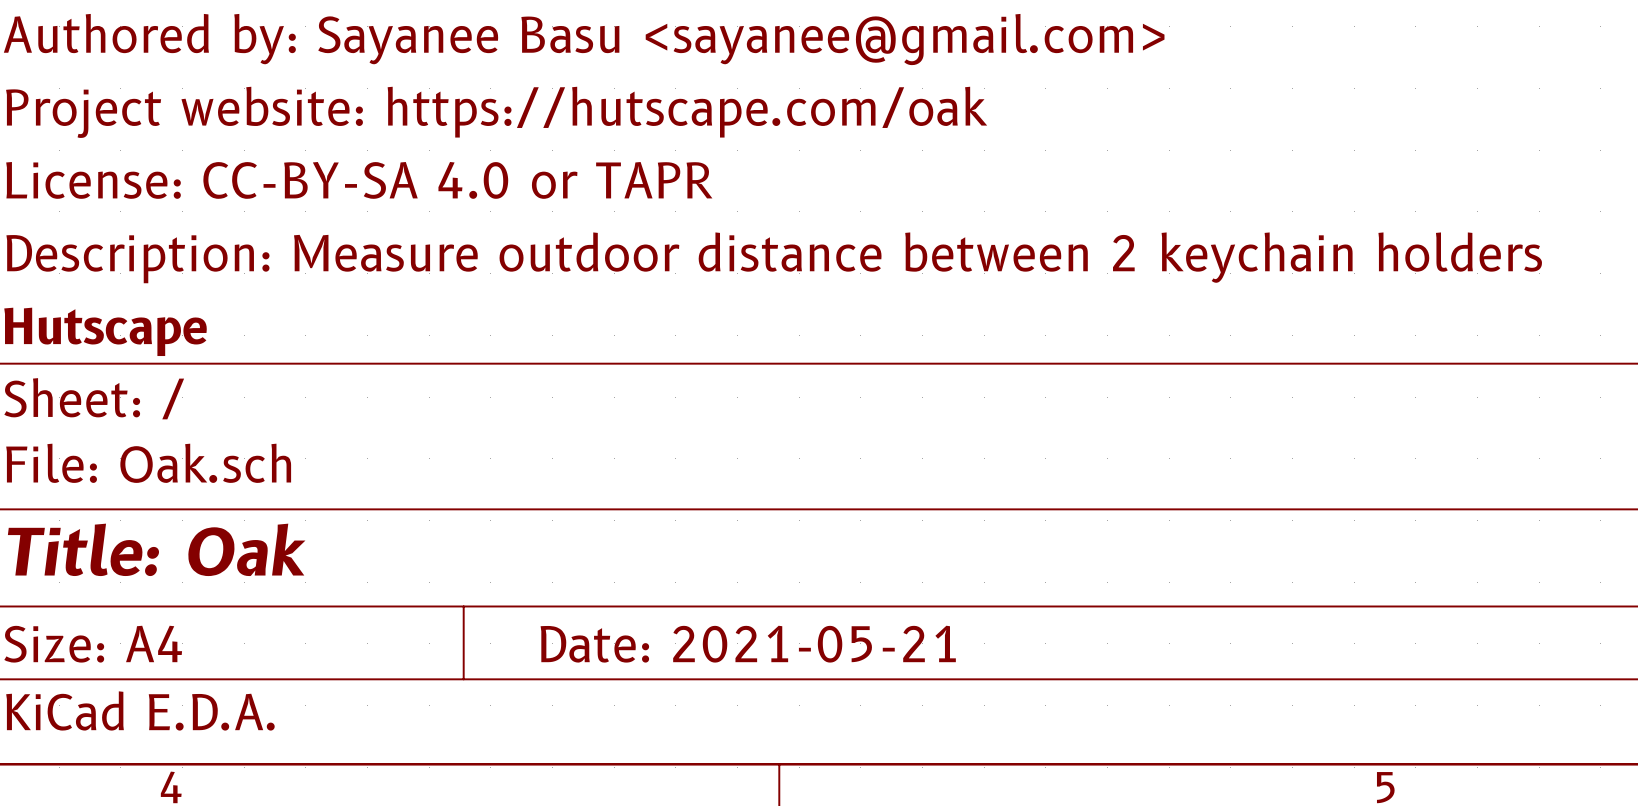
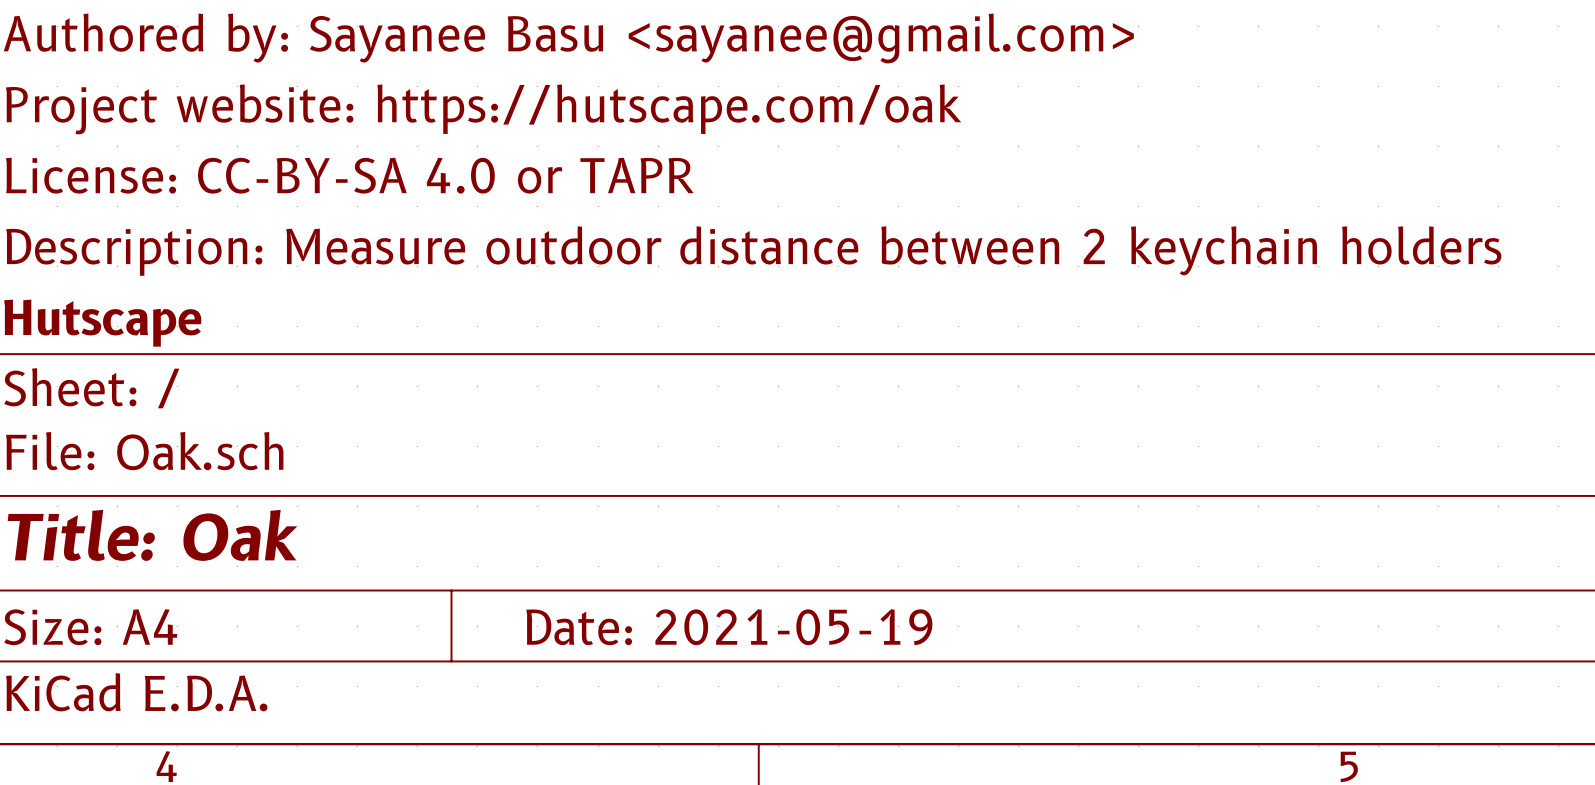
title block: Date: 2021-05-21 (748, 644) -> Date: 2021-05-19 (729, 627)

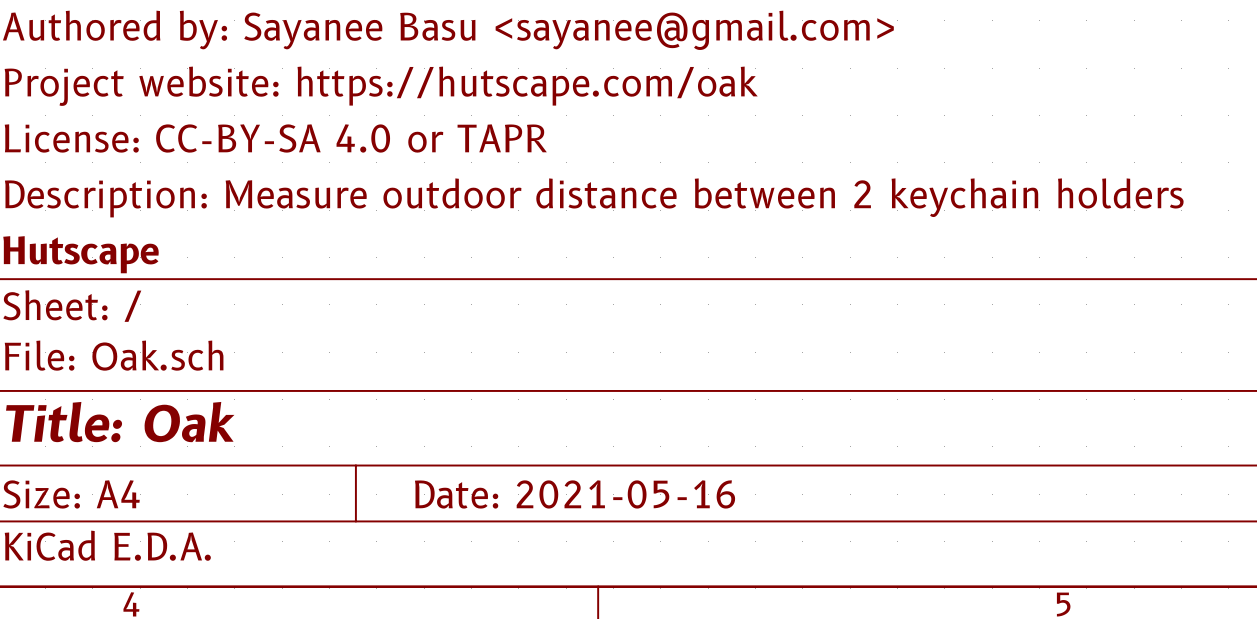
title block: Date: 2021-05-19 (729, 627) -> Date: 2021-05-16 (575, 494)

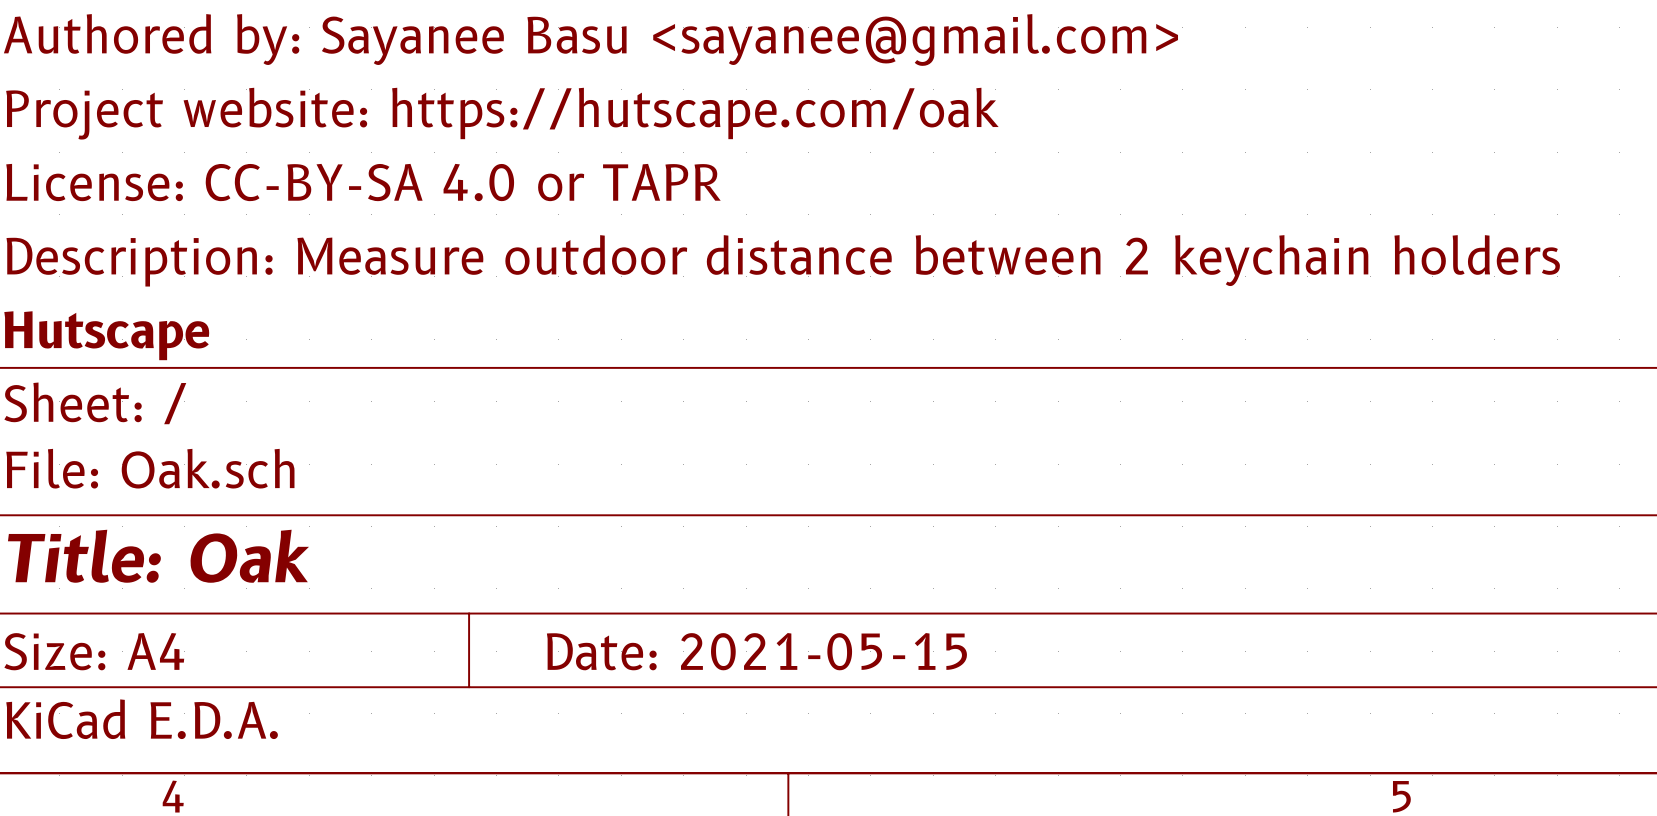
title block: Date: 2021-05-16 (575, 494) -> Date: 2021-05-15 (756, 651)

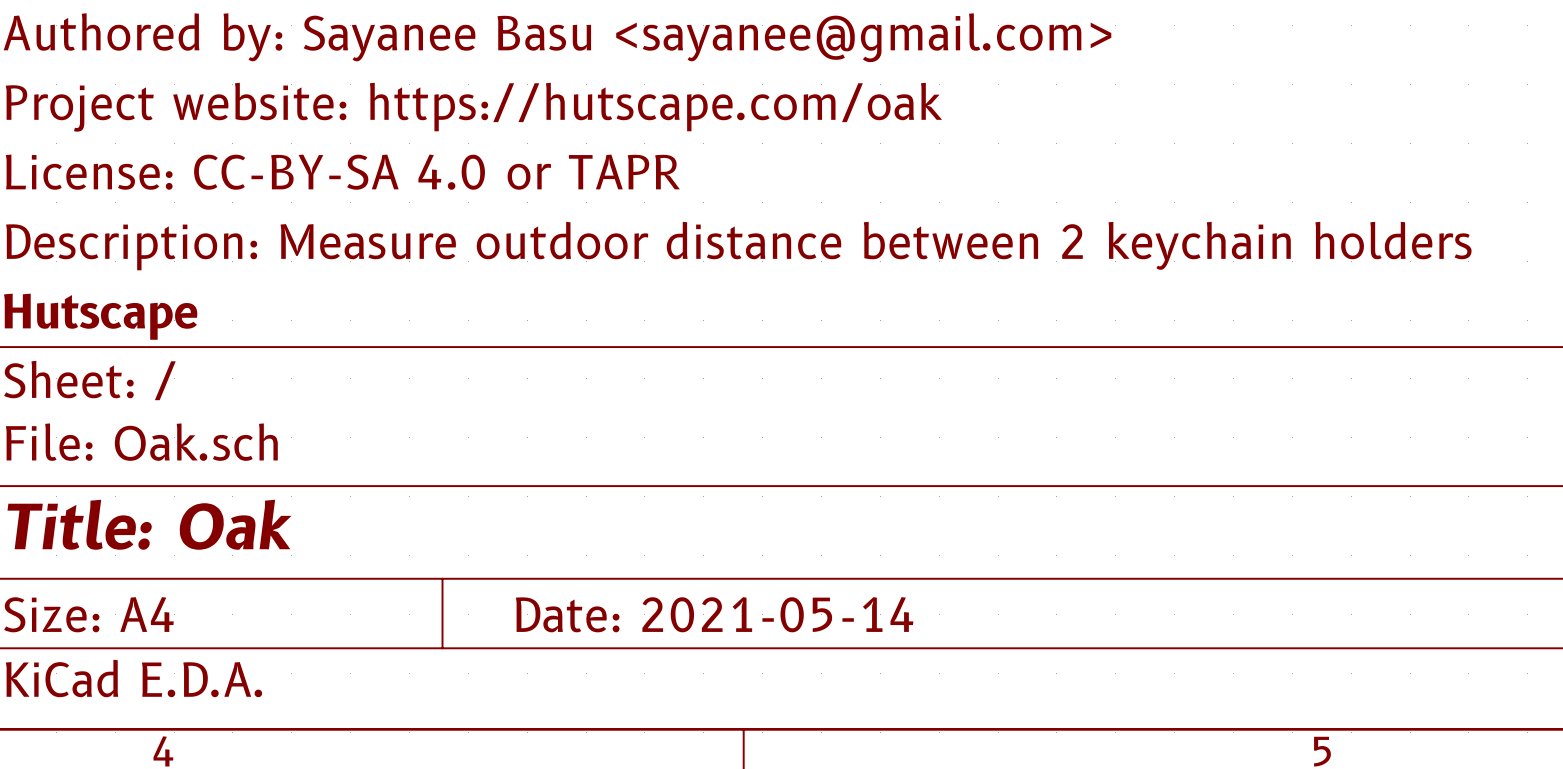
title block: Date: 2021-05-15 (756, 651) -> Date: 2021-05-14 (714, 614)

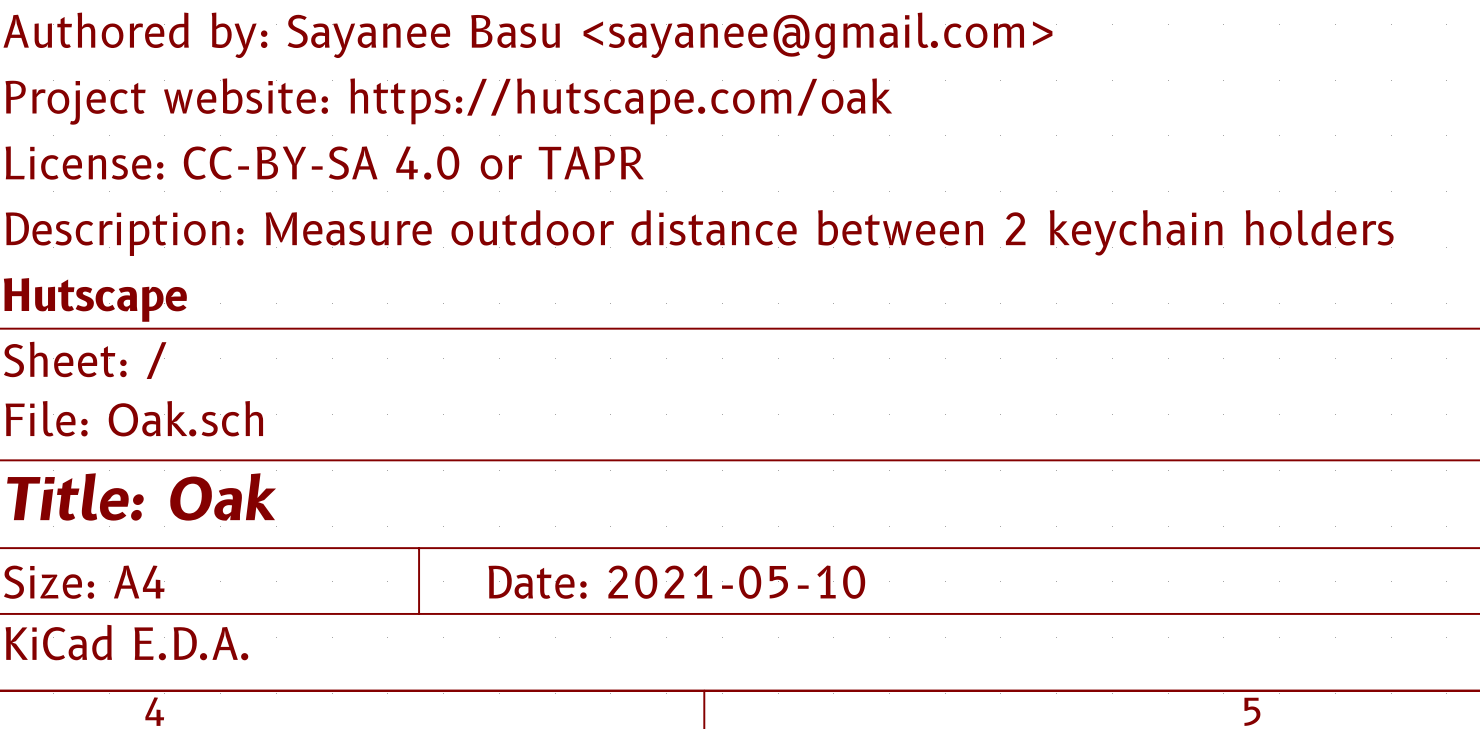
title block: Date: 2021-05-14 (714, 614) -> Date: 2021-05-10 (676, 582)

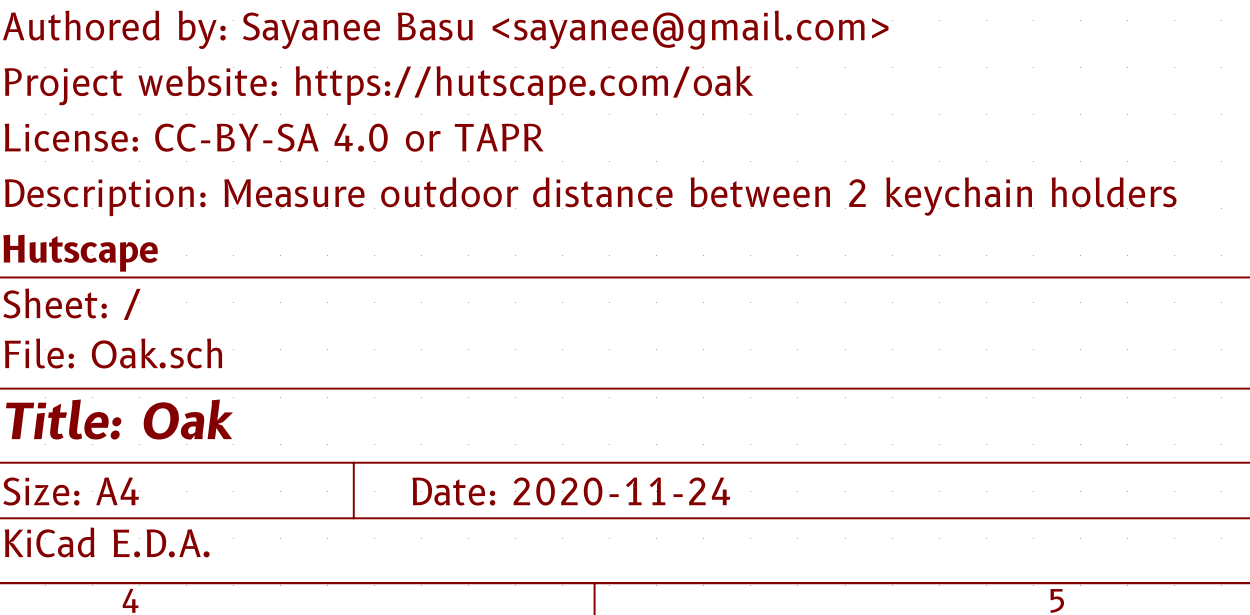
title block: Date: 2021-05-10 (676, 582) -> Date: 2020-11-24 (571, 491)

